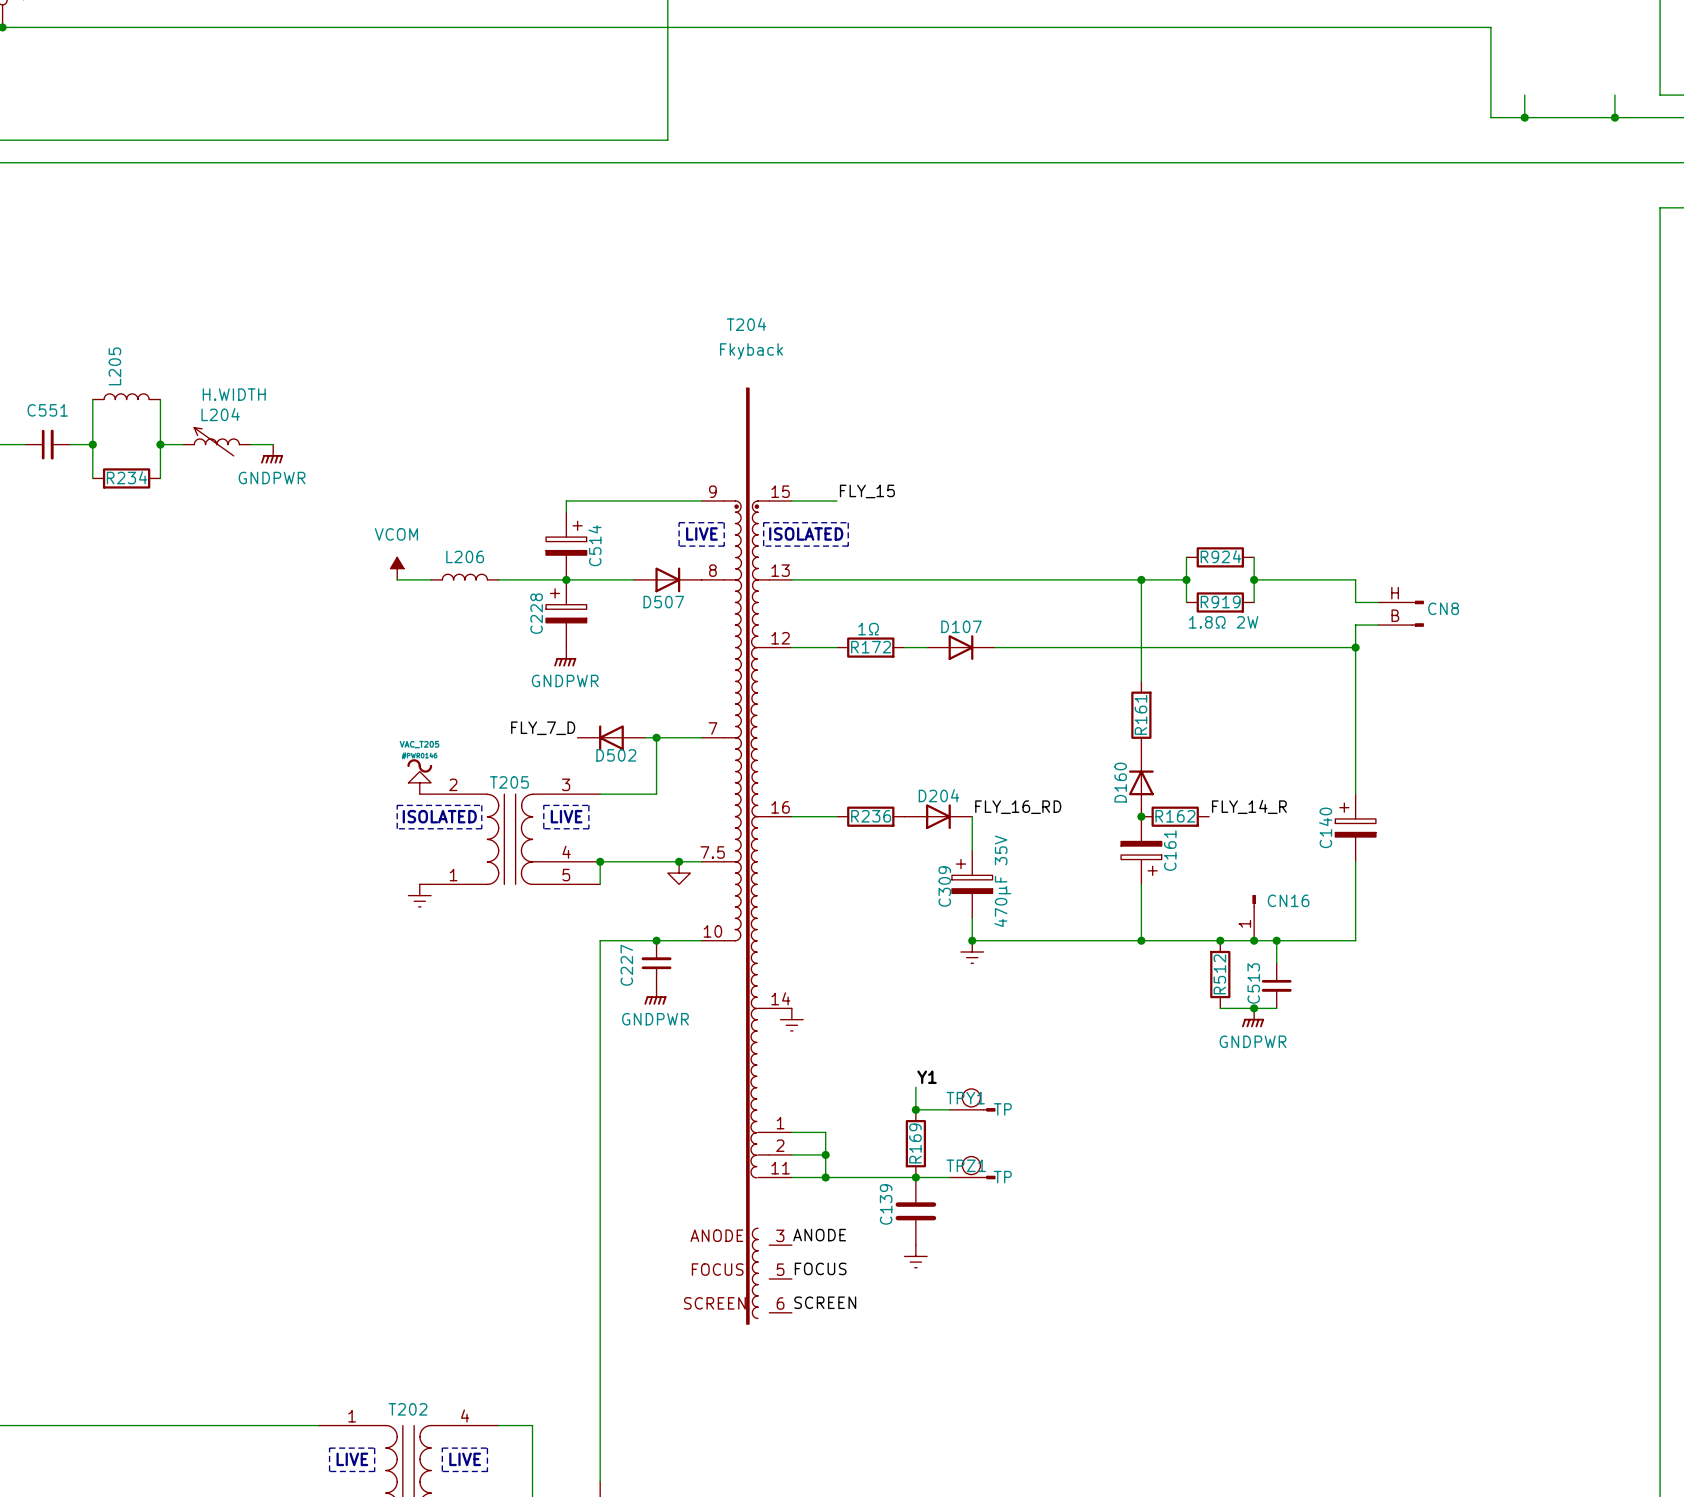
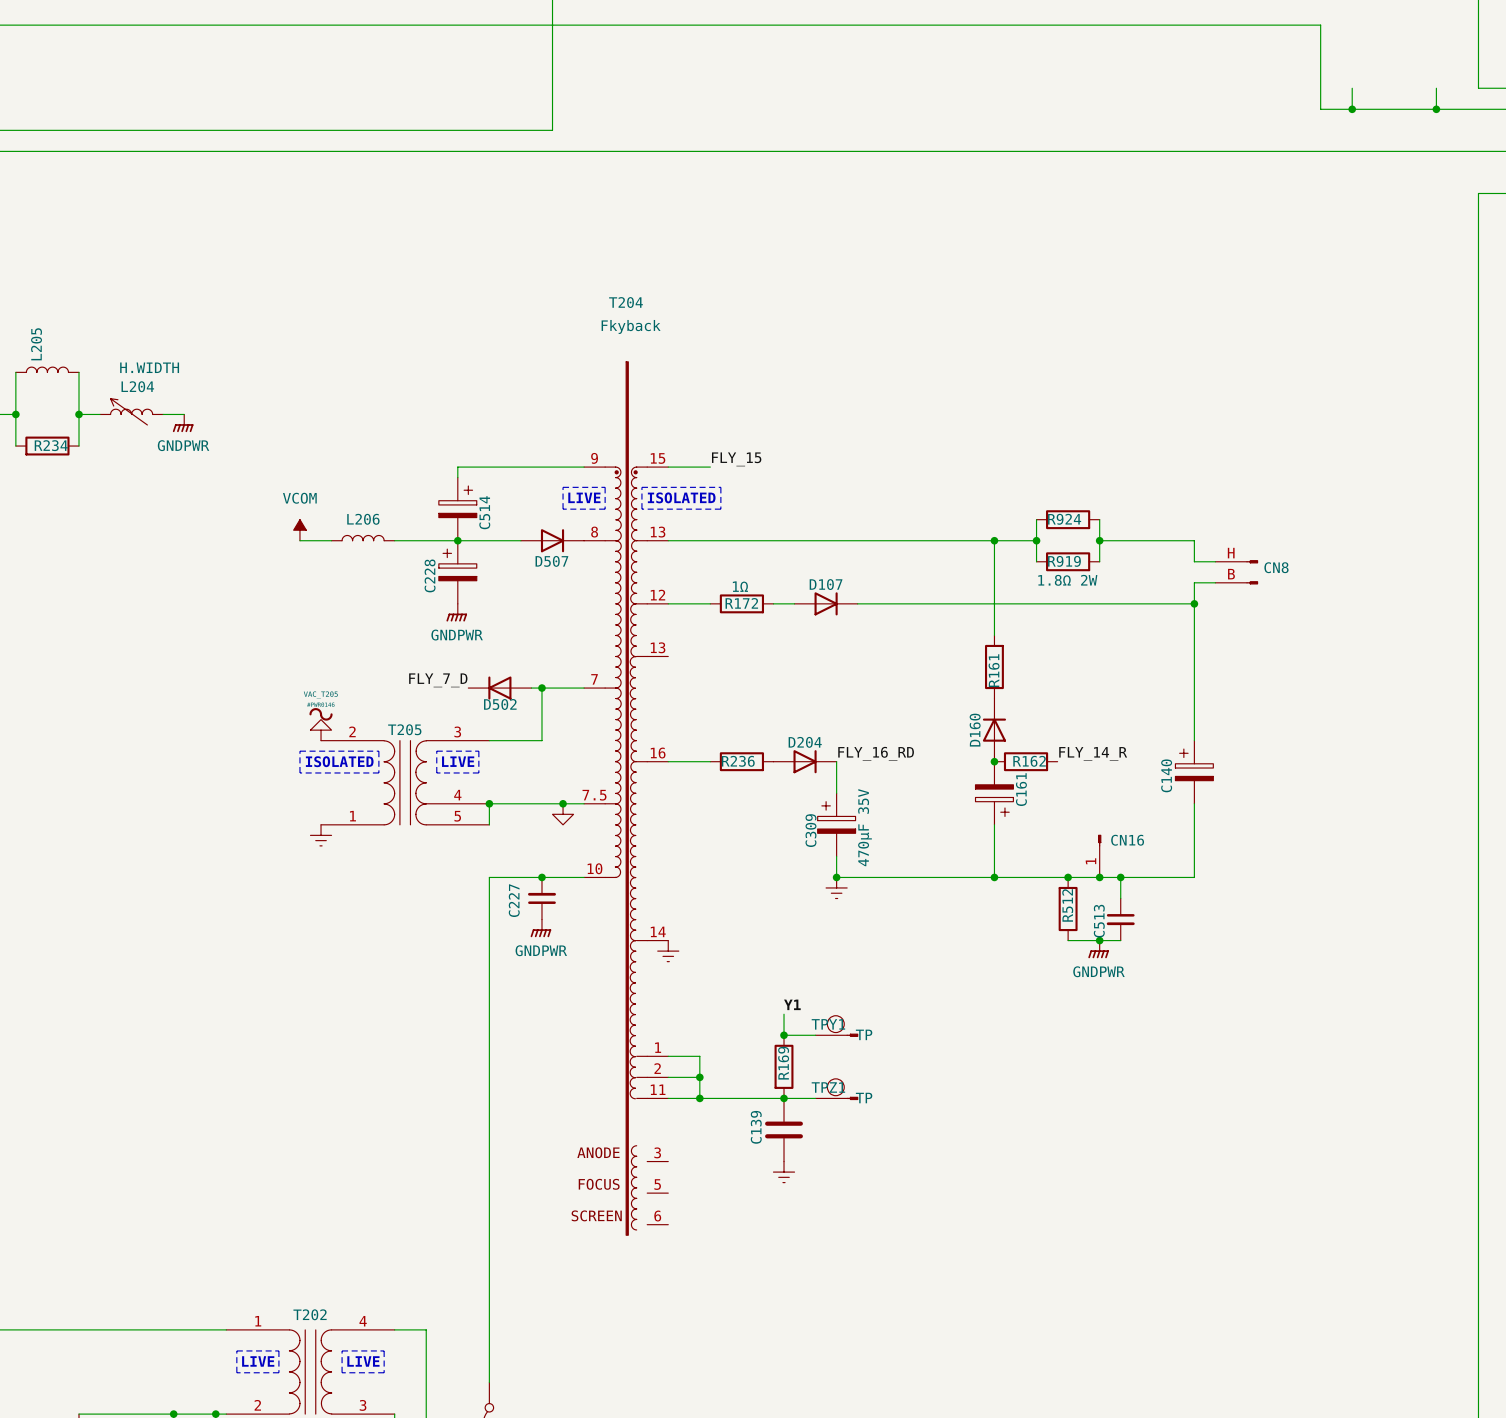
T204 symbol: [701, 388, 792, 1325] -> [584, 361, 669, 1236]
label: ANODE (819, 1235) -> none
label: FOCUS (820, 1268) -> none
label: SCREEN (825, 1302) -> none

